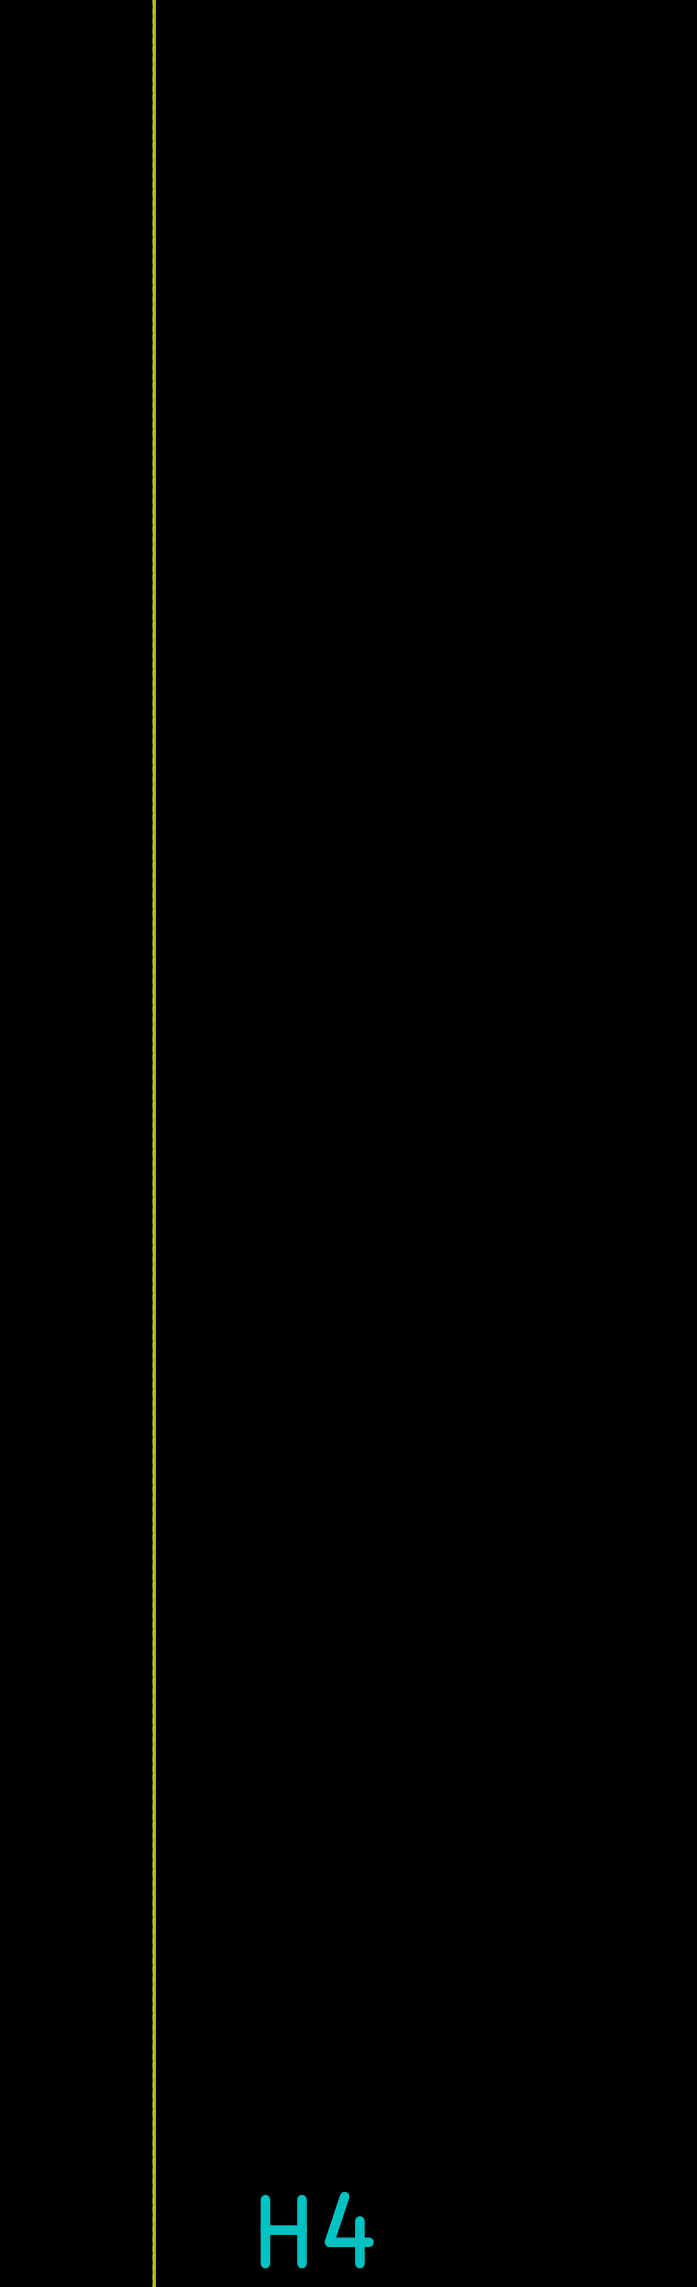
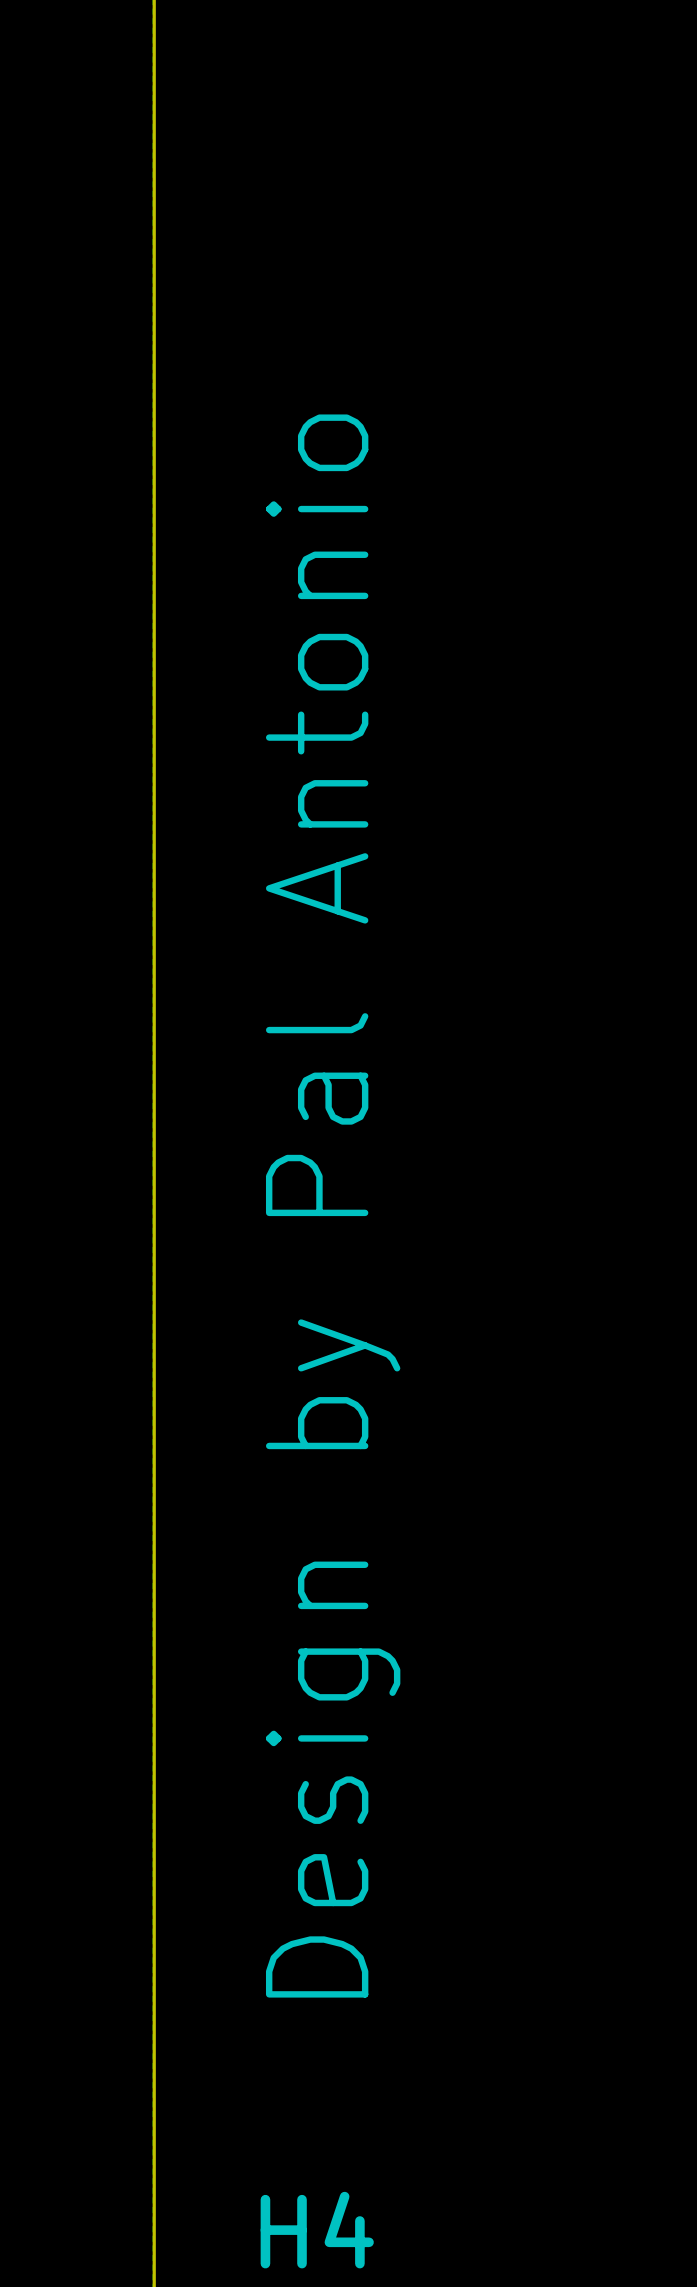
text: none -> Design by Pal Antonio (333, 1206)

